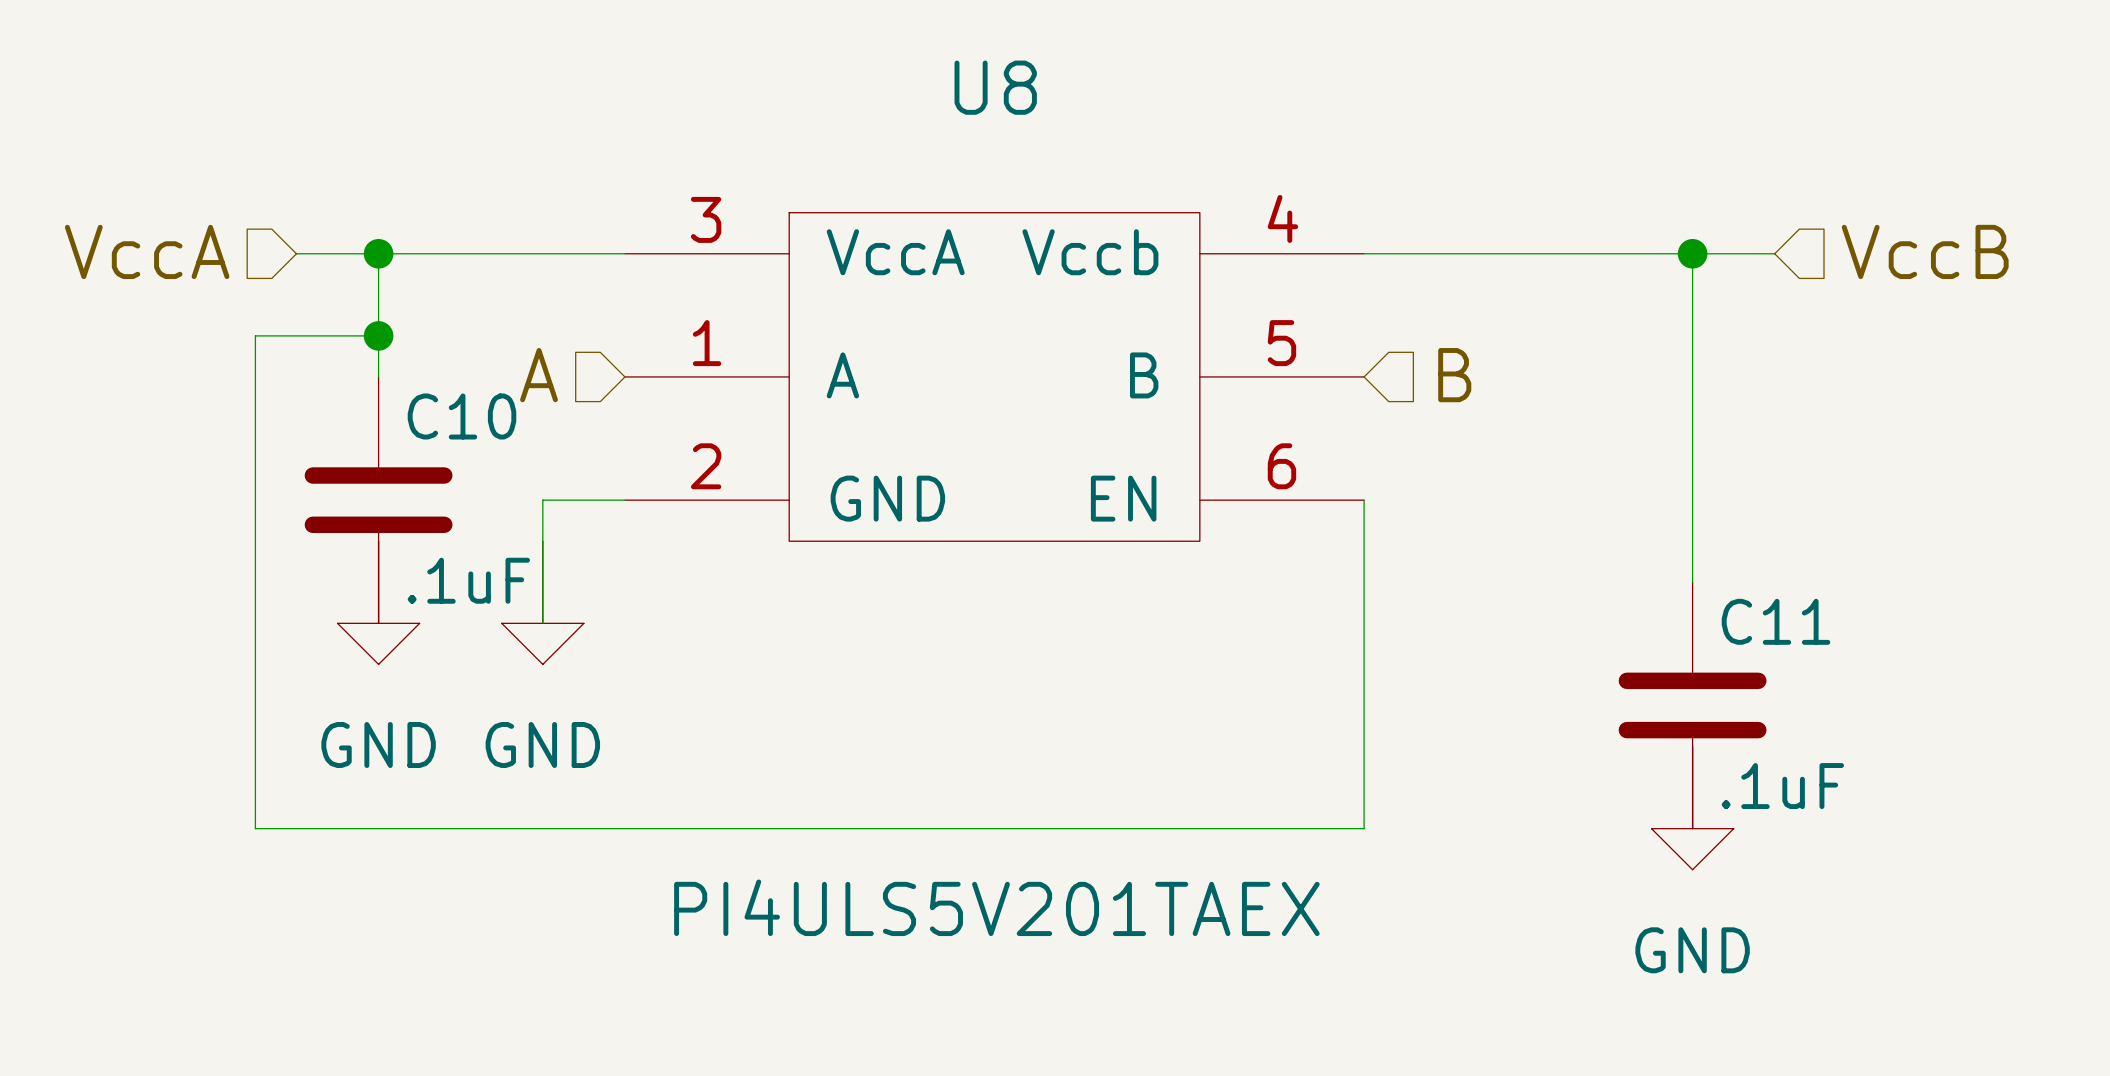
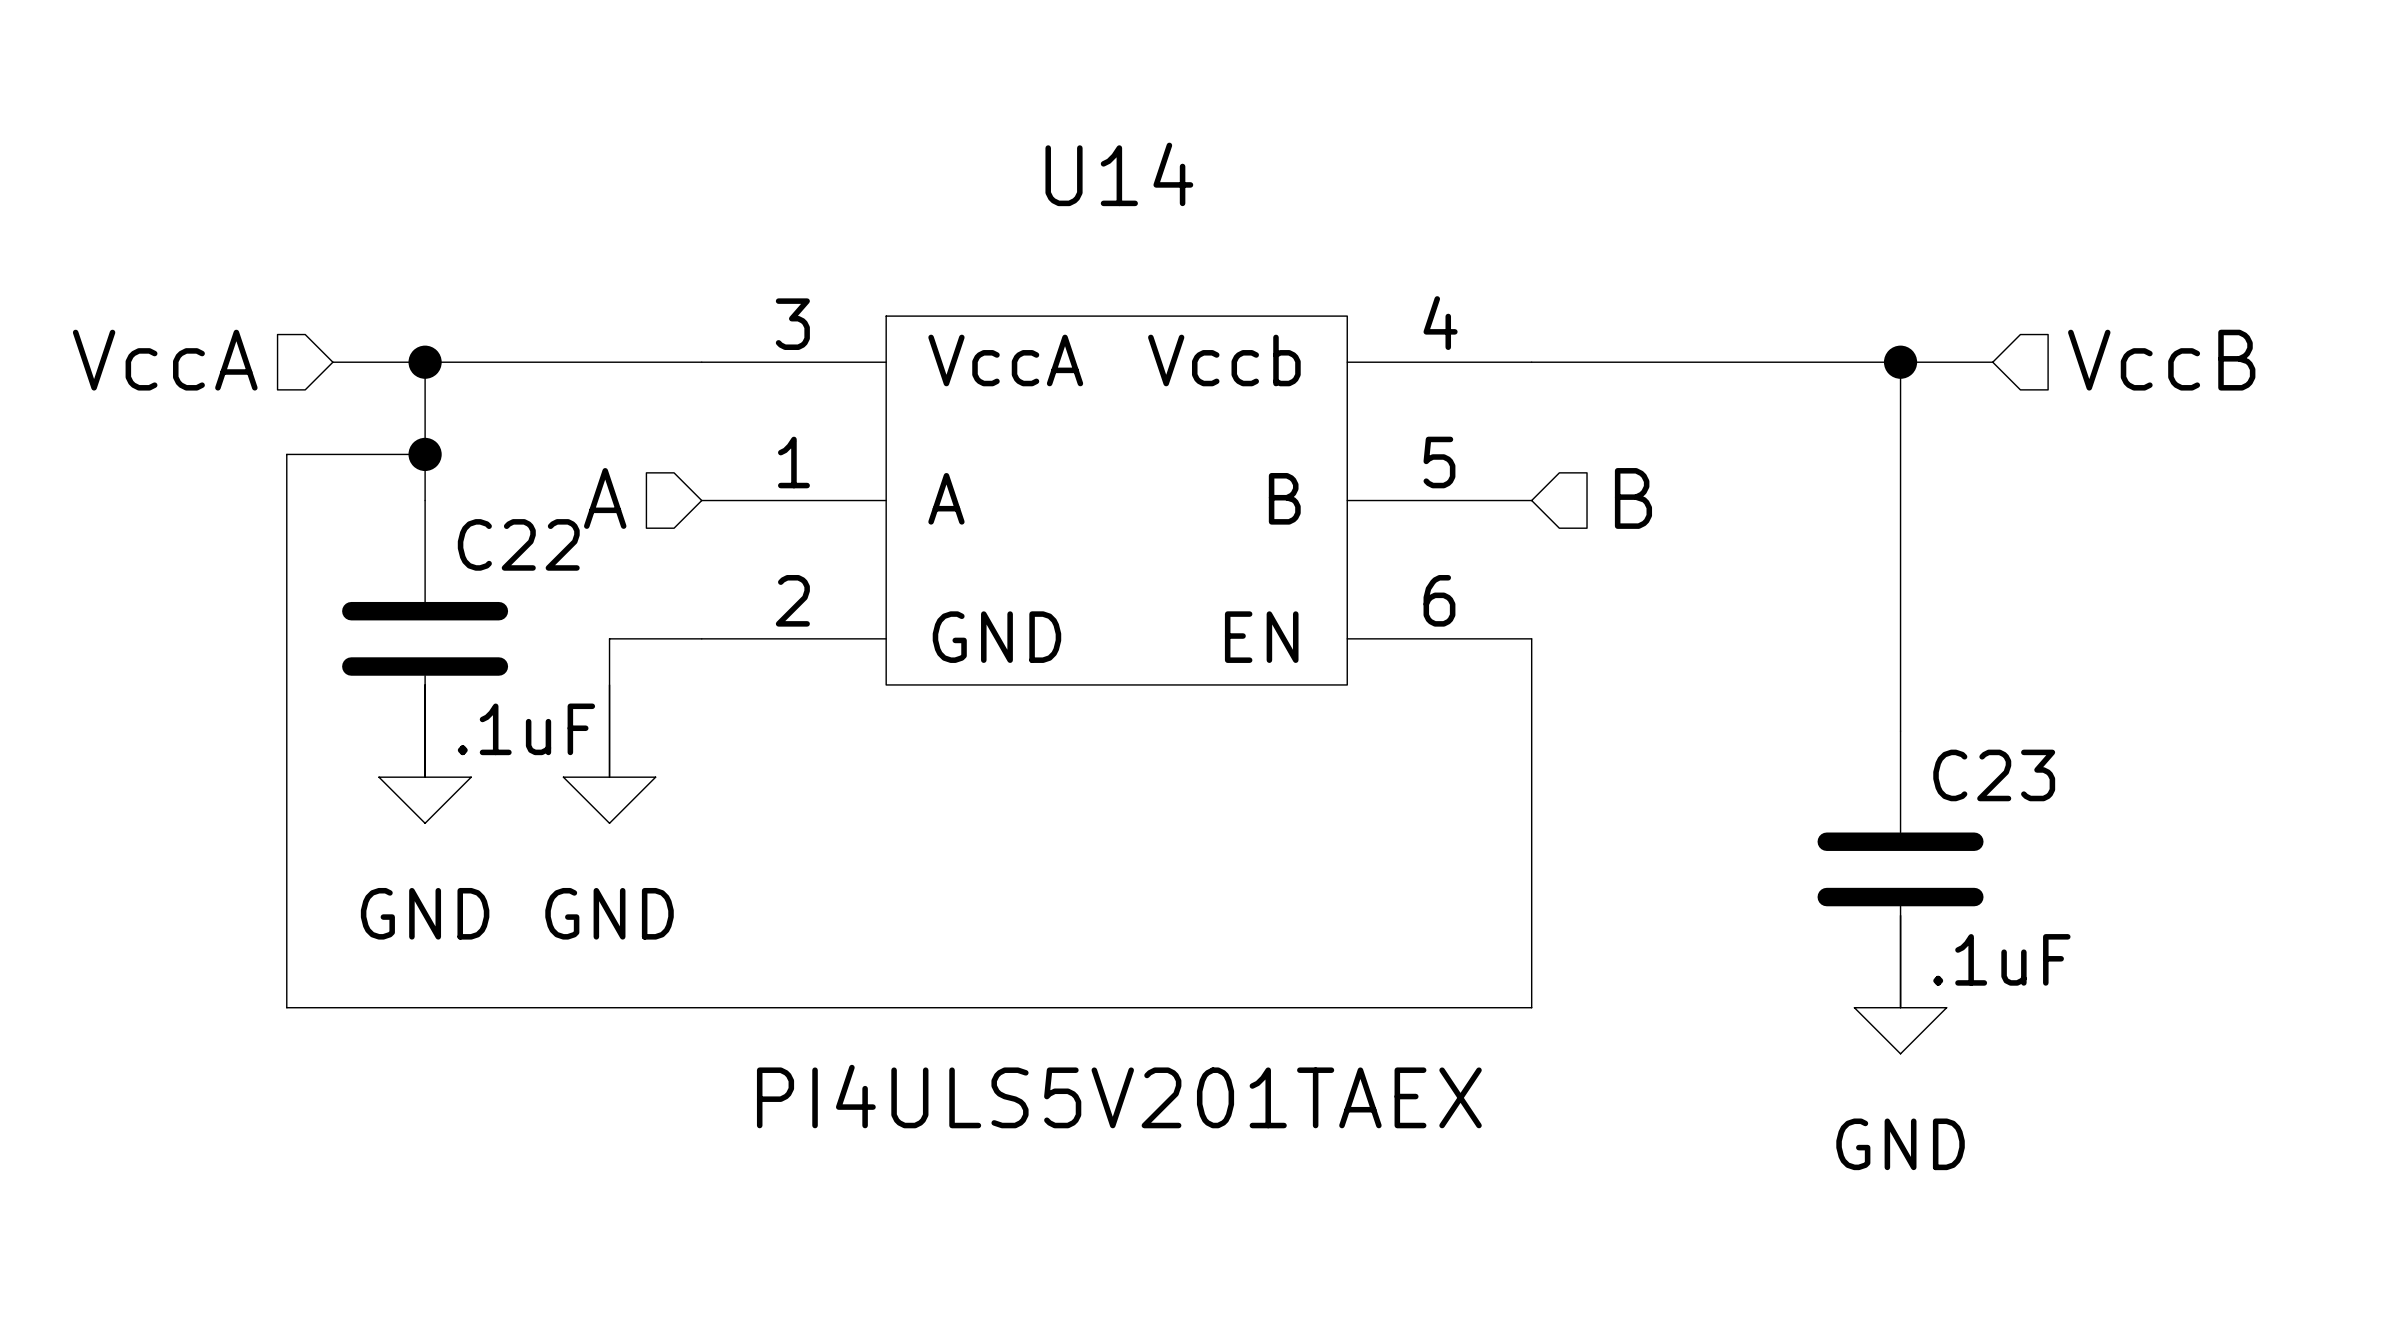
U8 name: U8 (995, 87) -> U14 (1119, 174)
C10 name: C10 (462, 416) -> C22 (518, 544)
C11 name: C11 (1776, 621) -> C23 (1994, 775)

